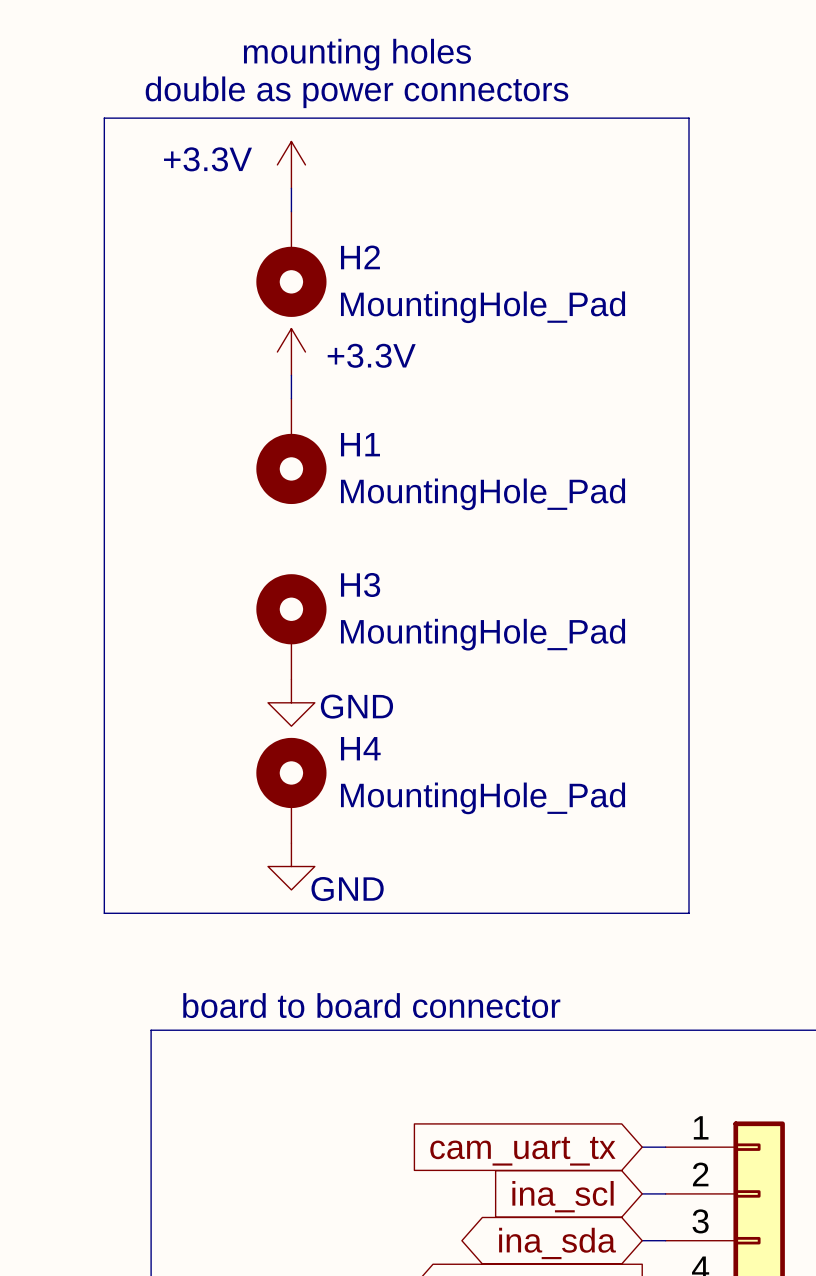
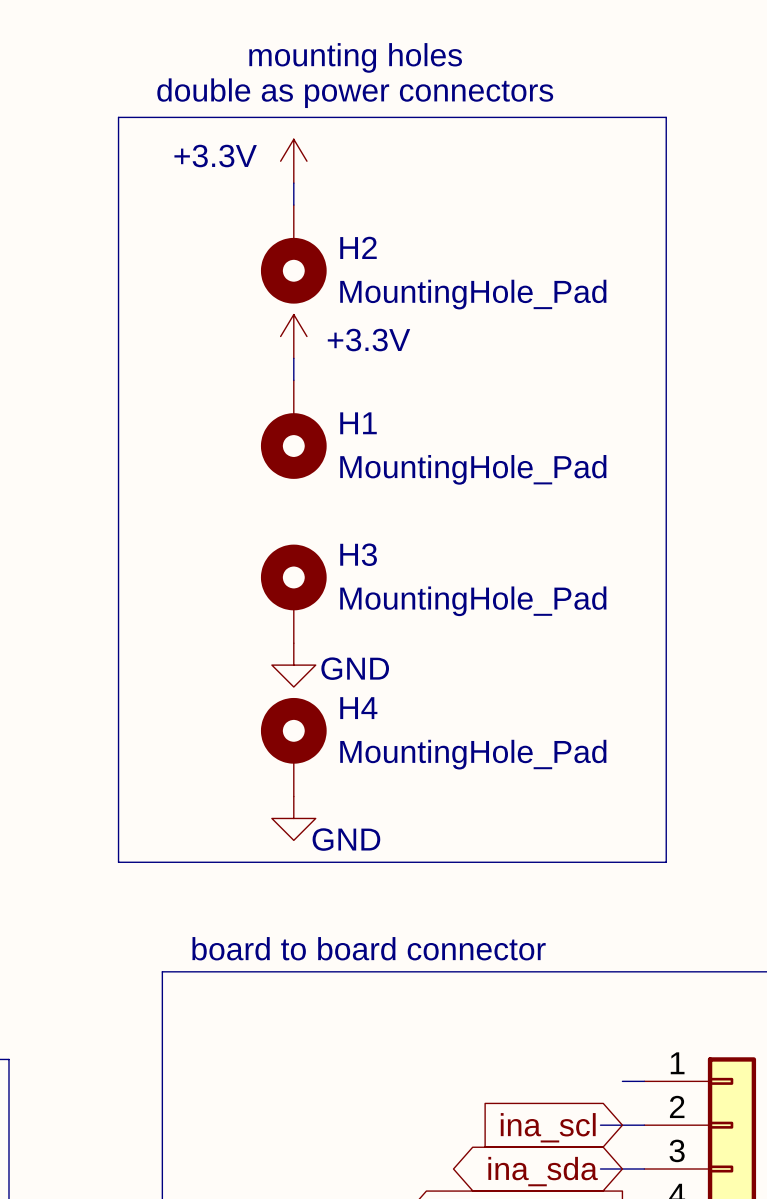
global label: cam_uart_tx (522, 1151) -> none
wire: none -> (600, 1125) (622, 1125)
wire: none -> (600, 1169) (622, 1169)

